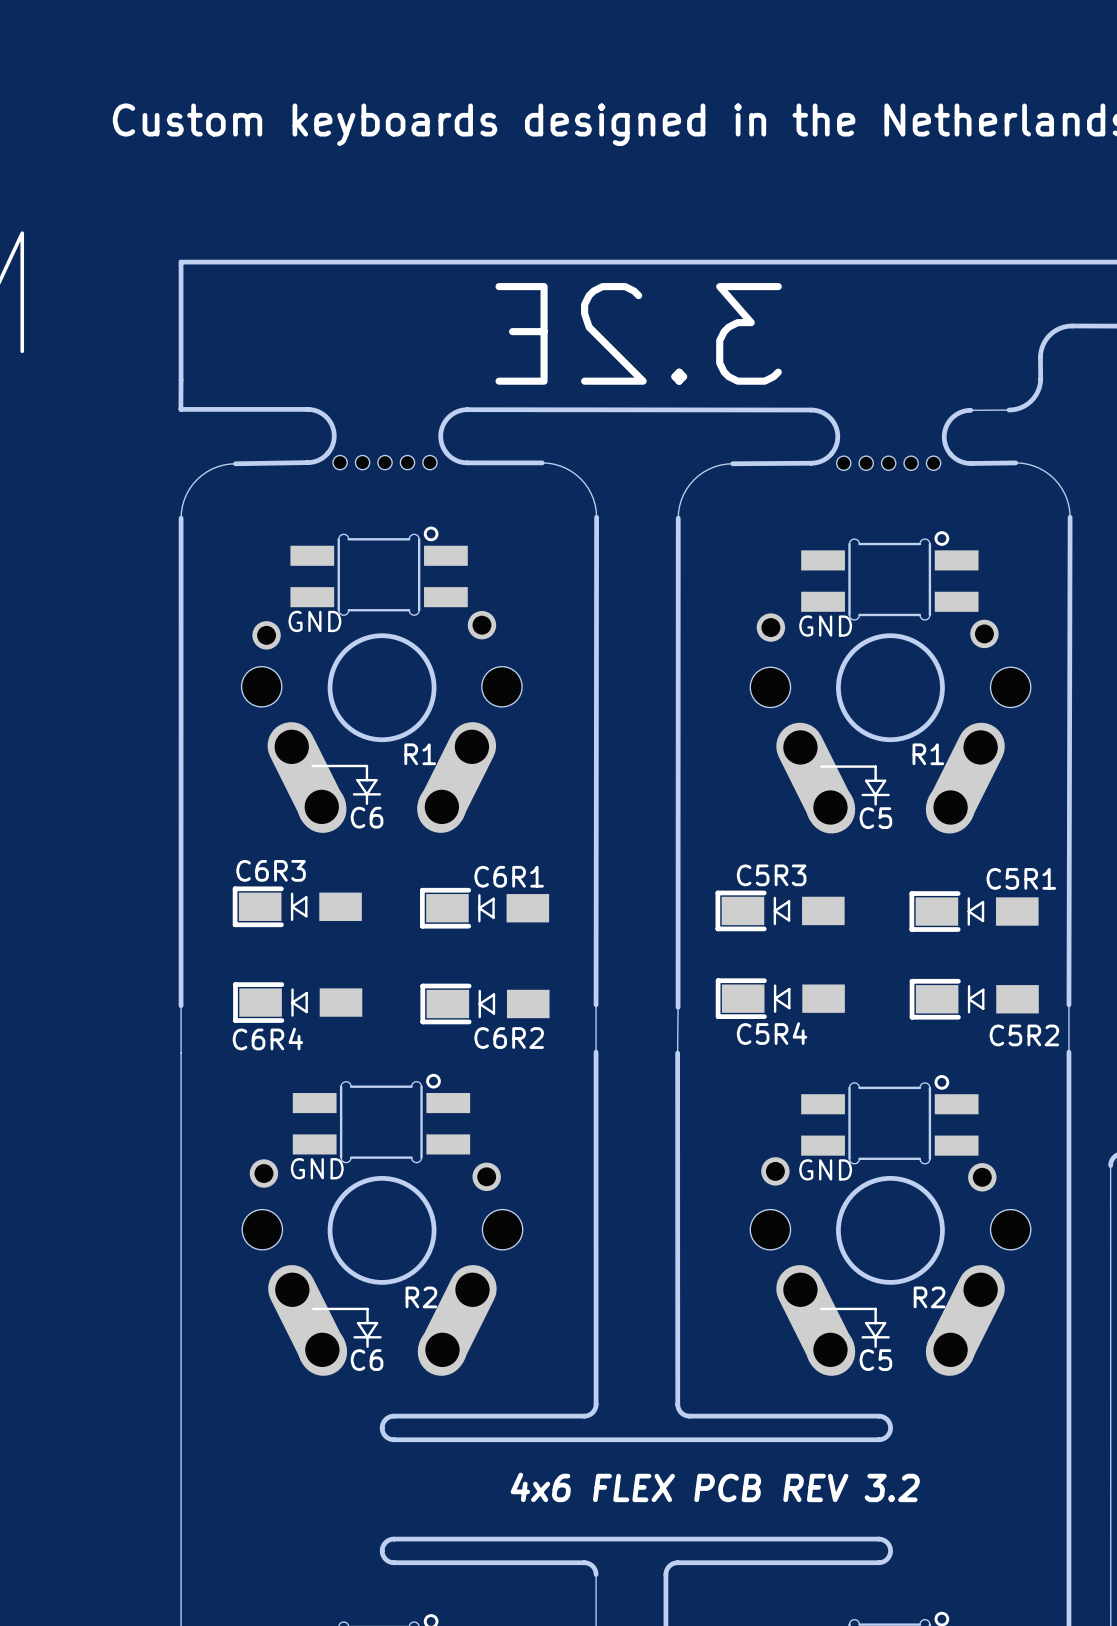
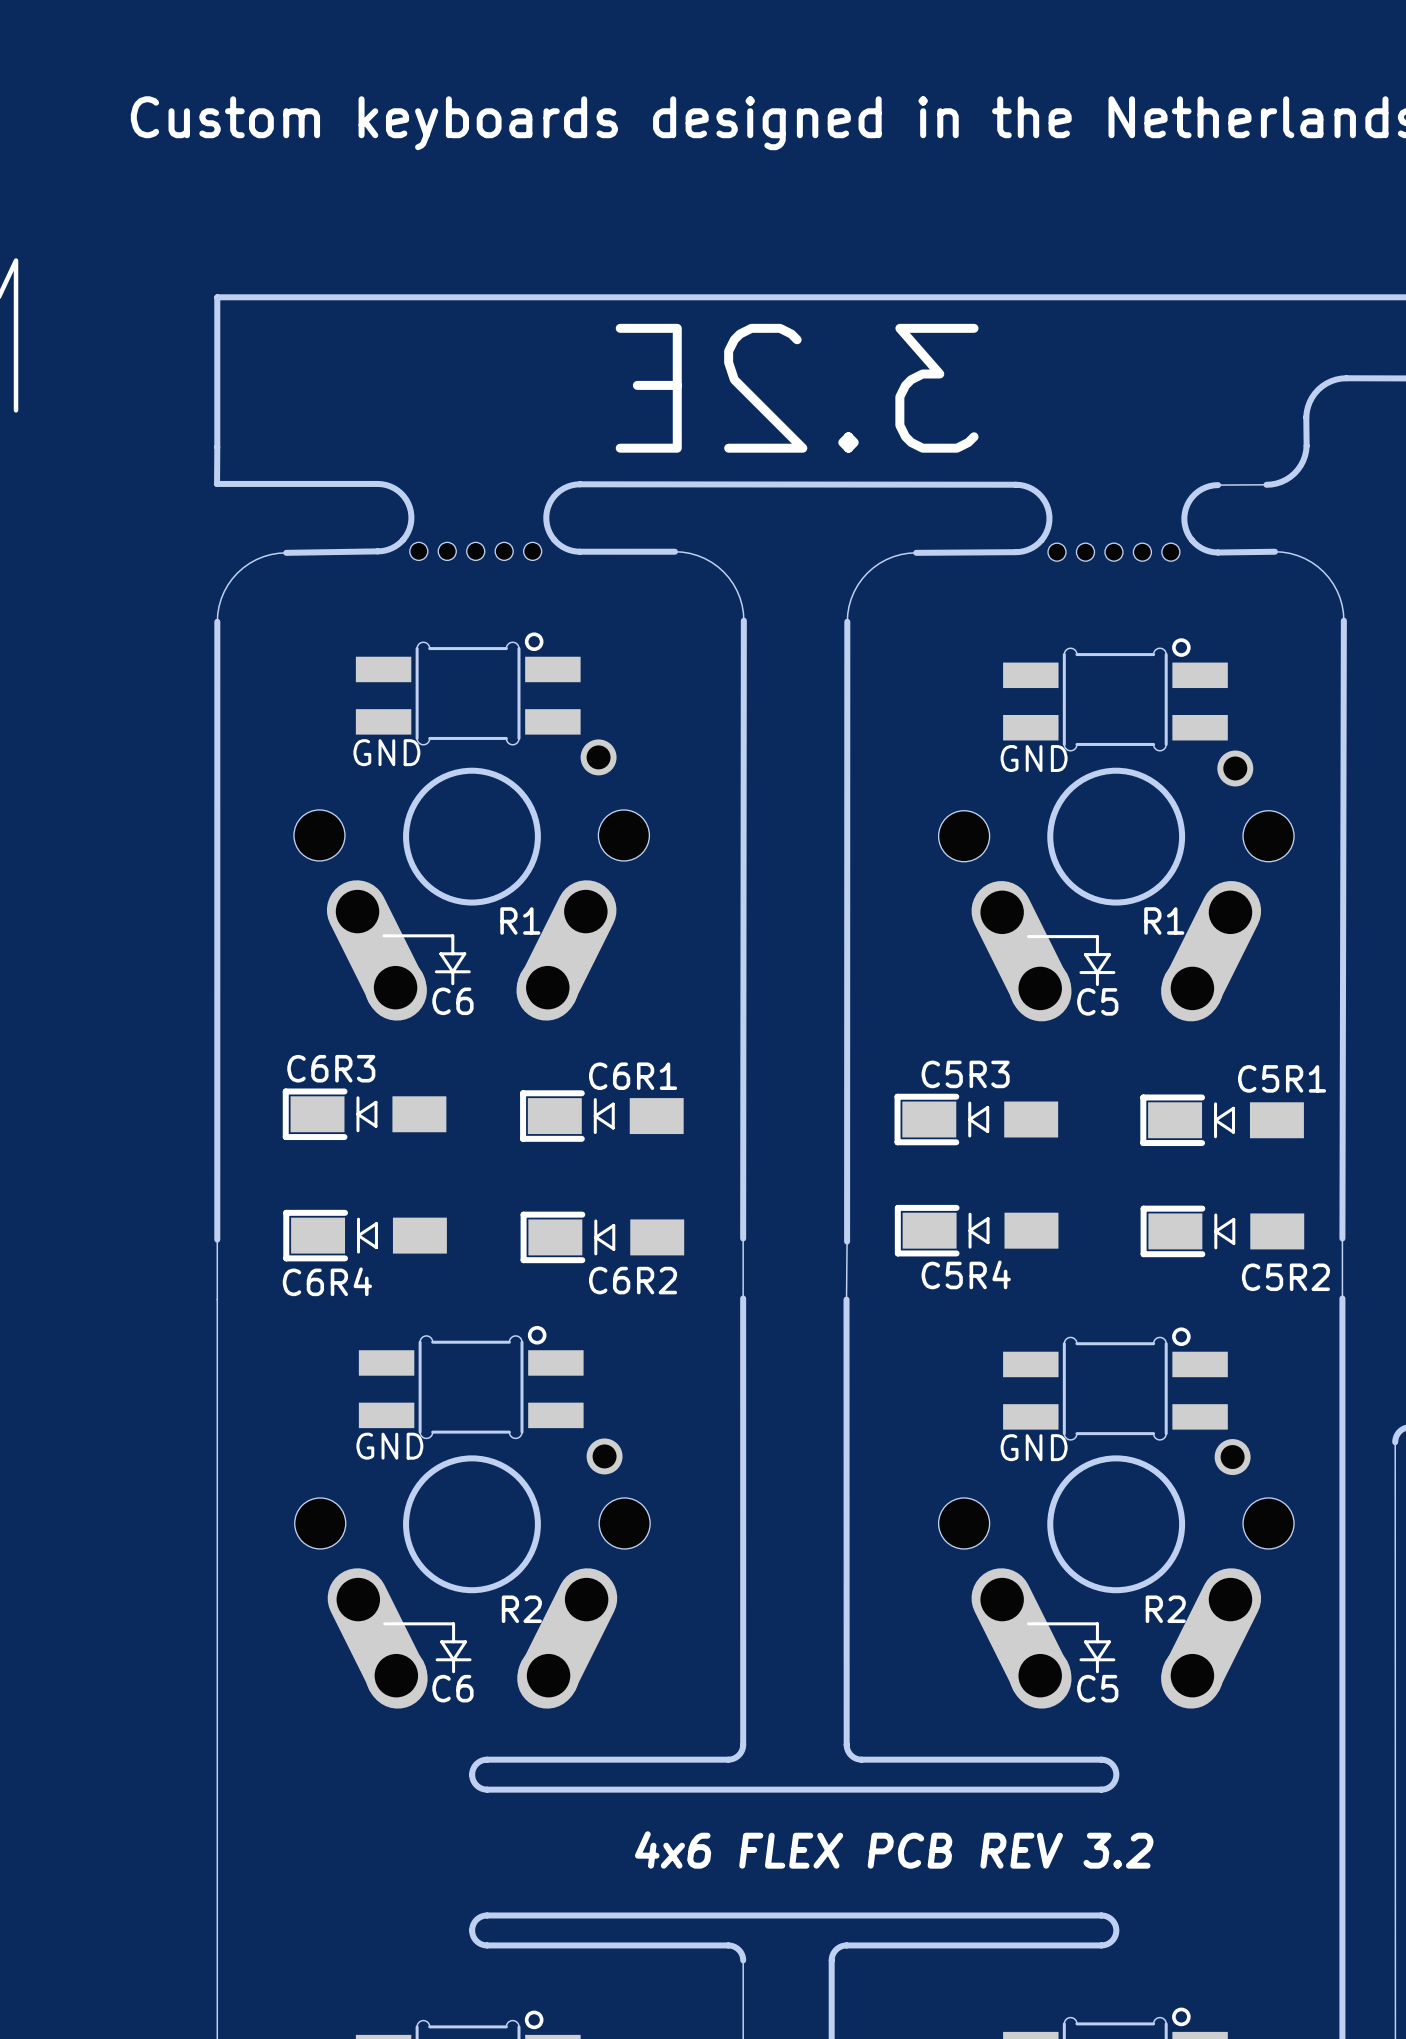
part: (770, 627) -> none
part: (266, 635) -> none
part: (775, 1171) -> none
part: (263, 1173) -> none

